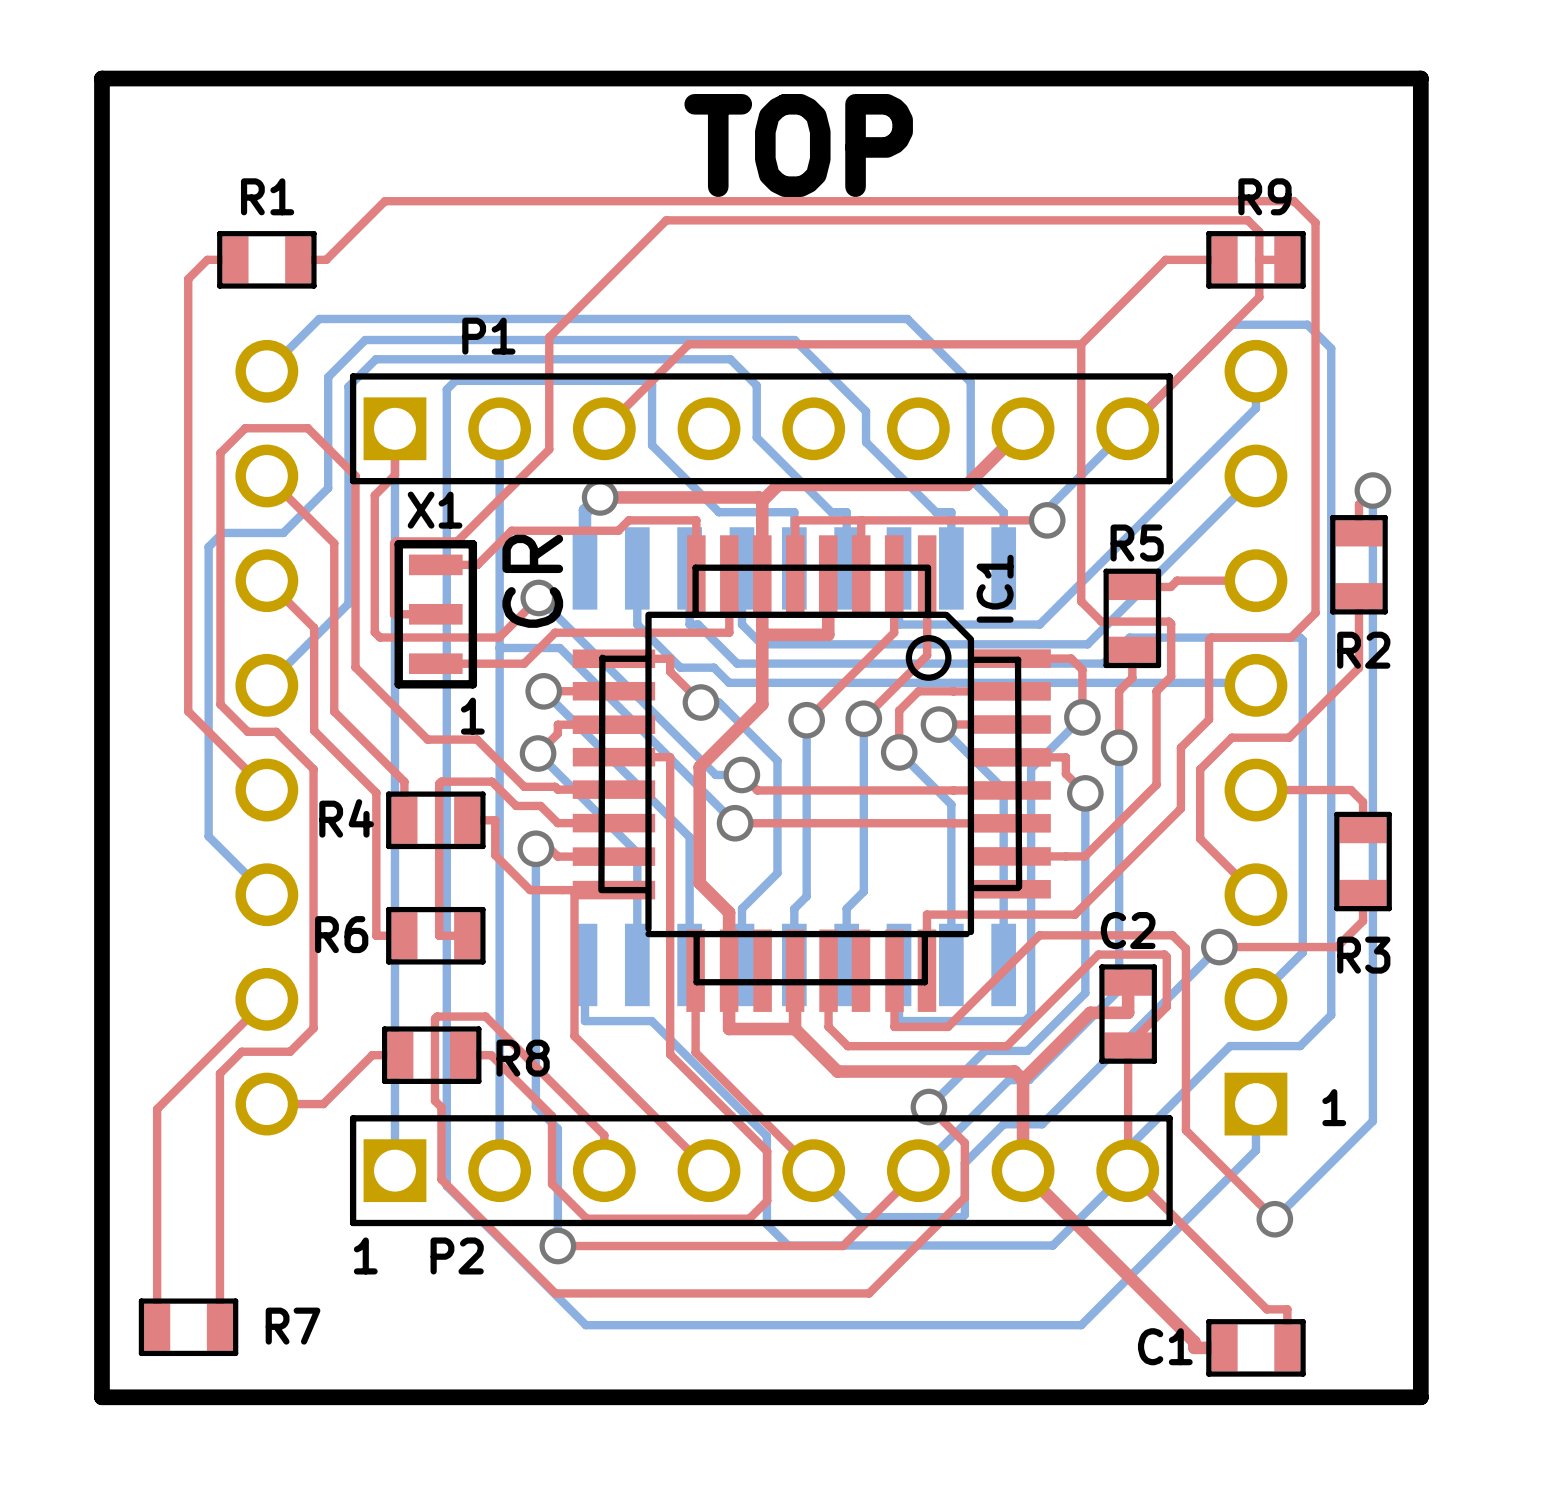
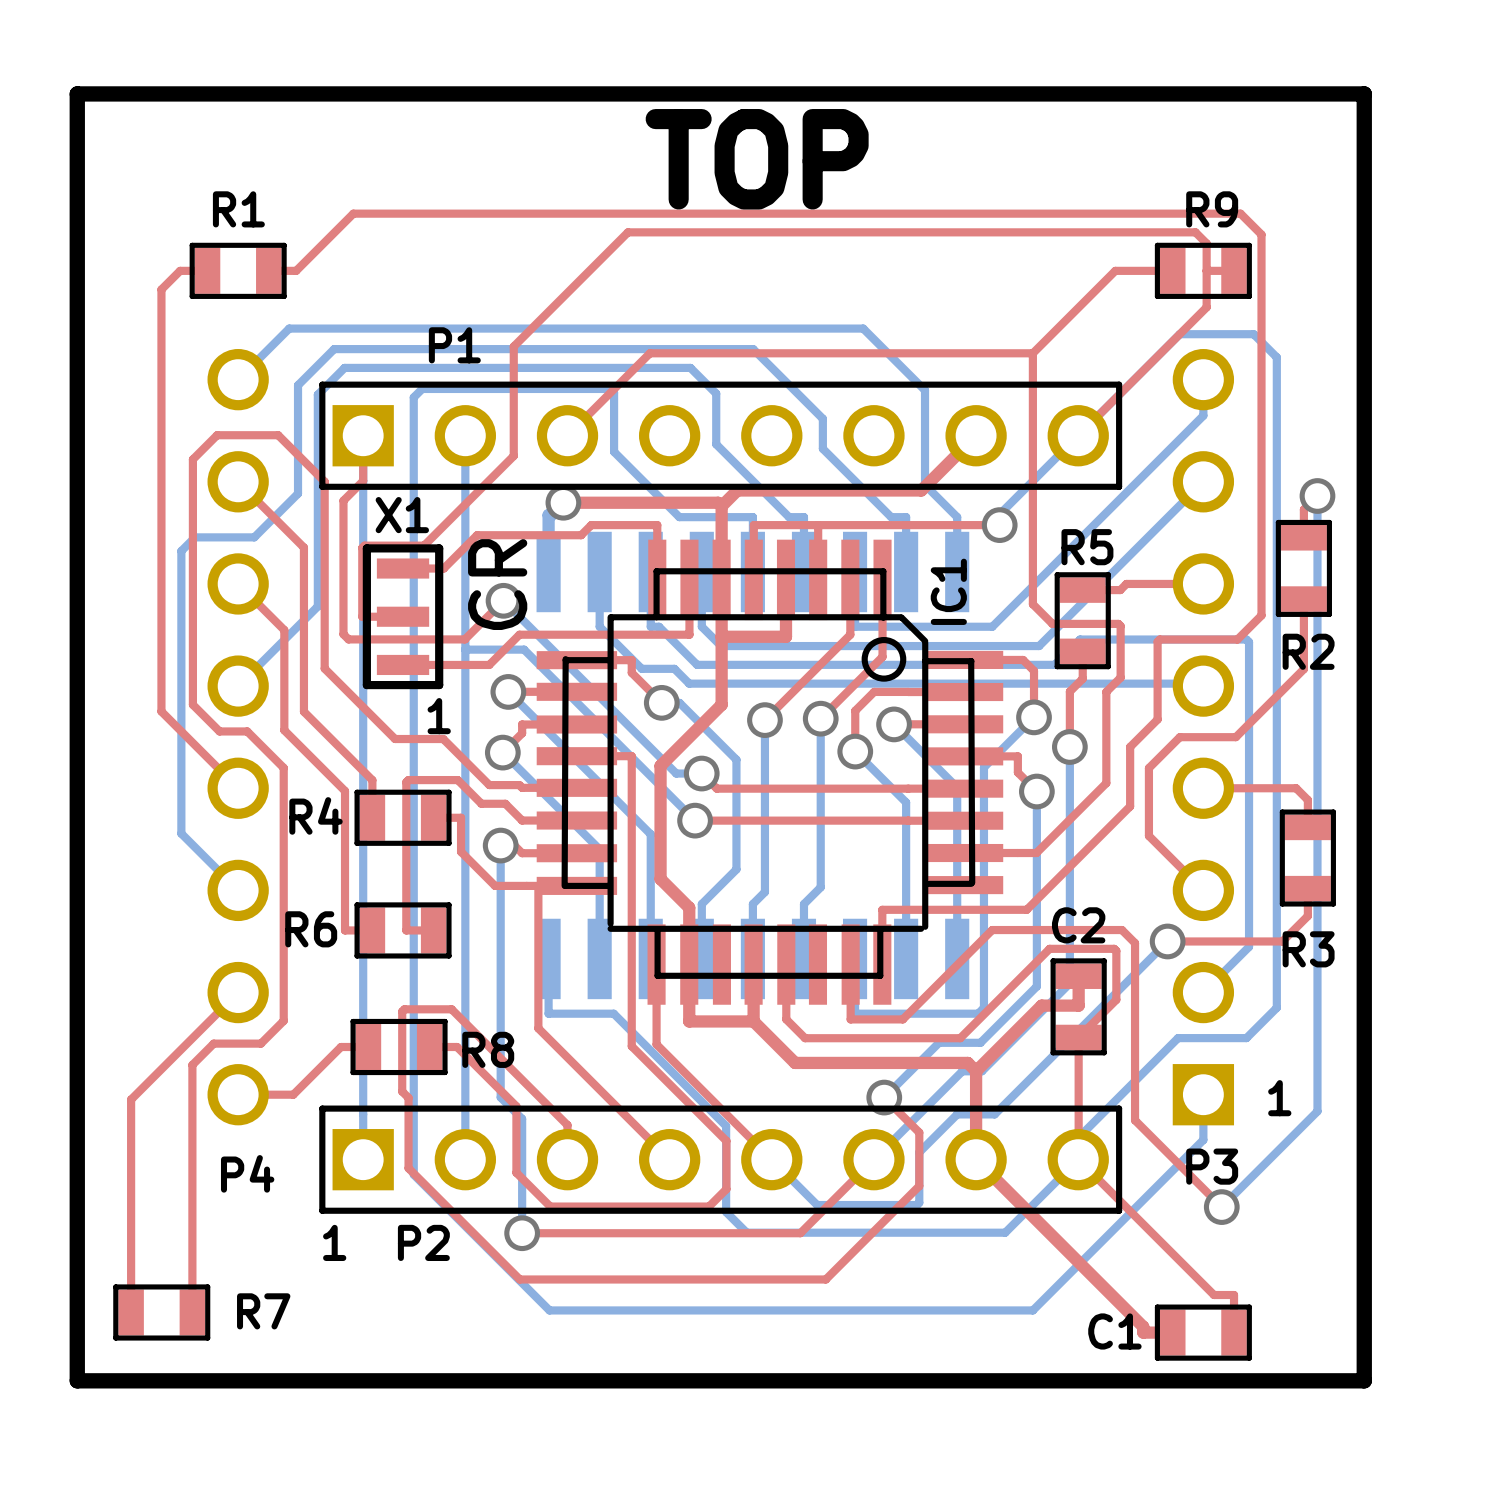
text: none -> P3 (1212, 1166)
text: none -> P4 (247, 1173)

